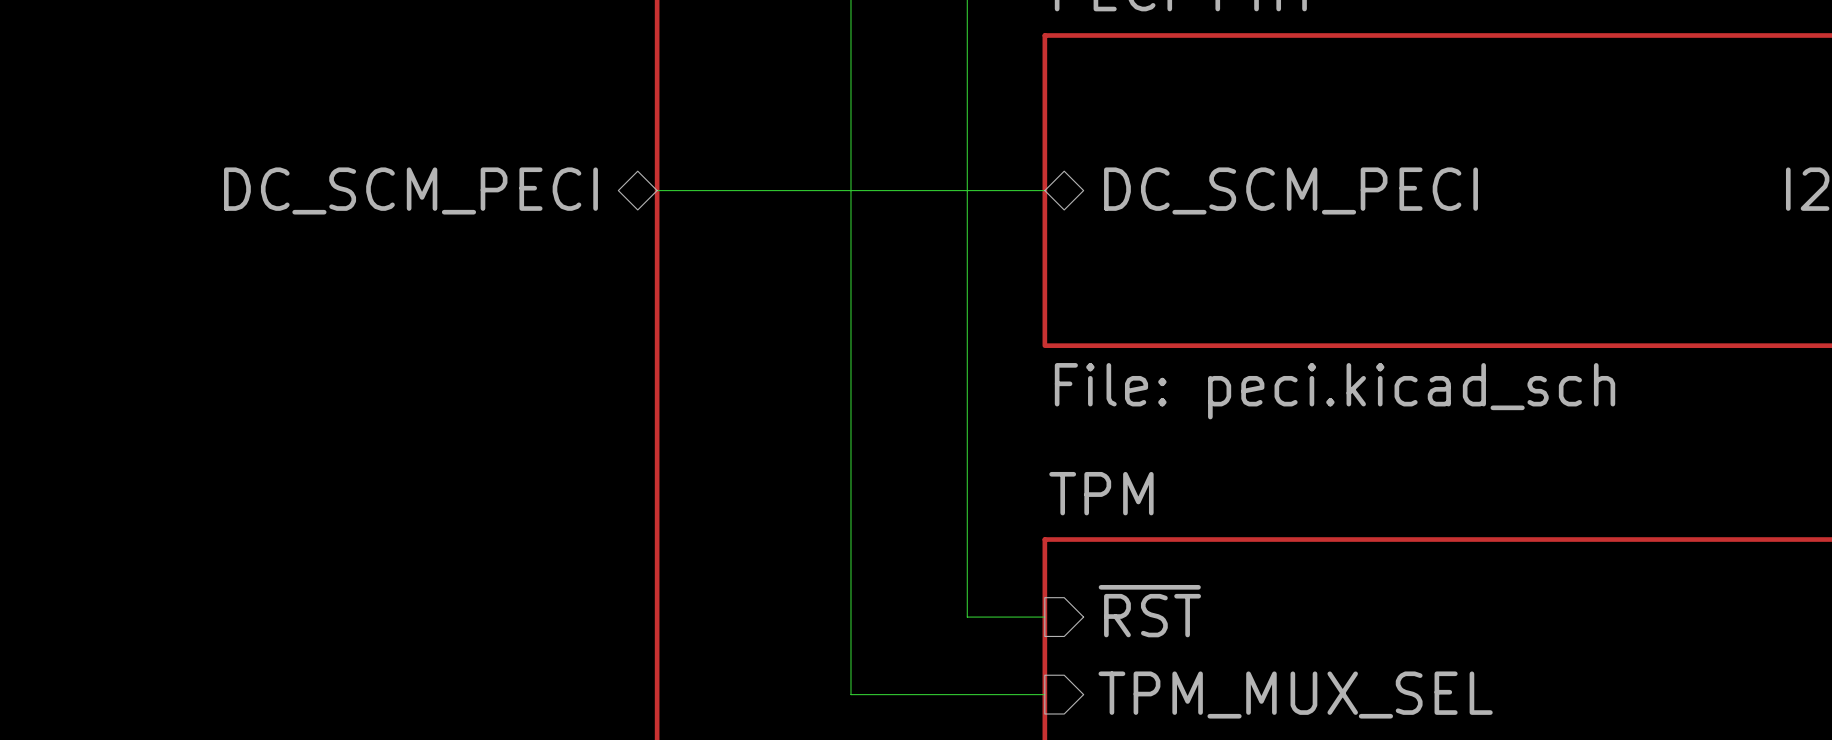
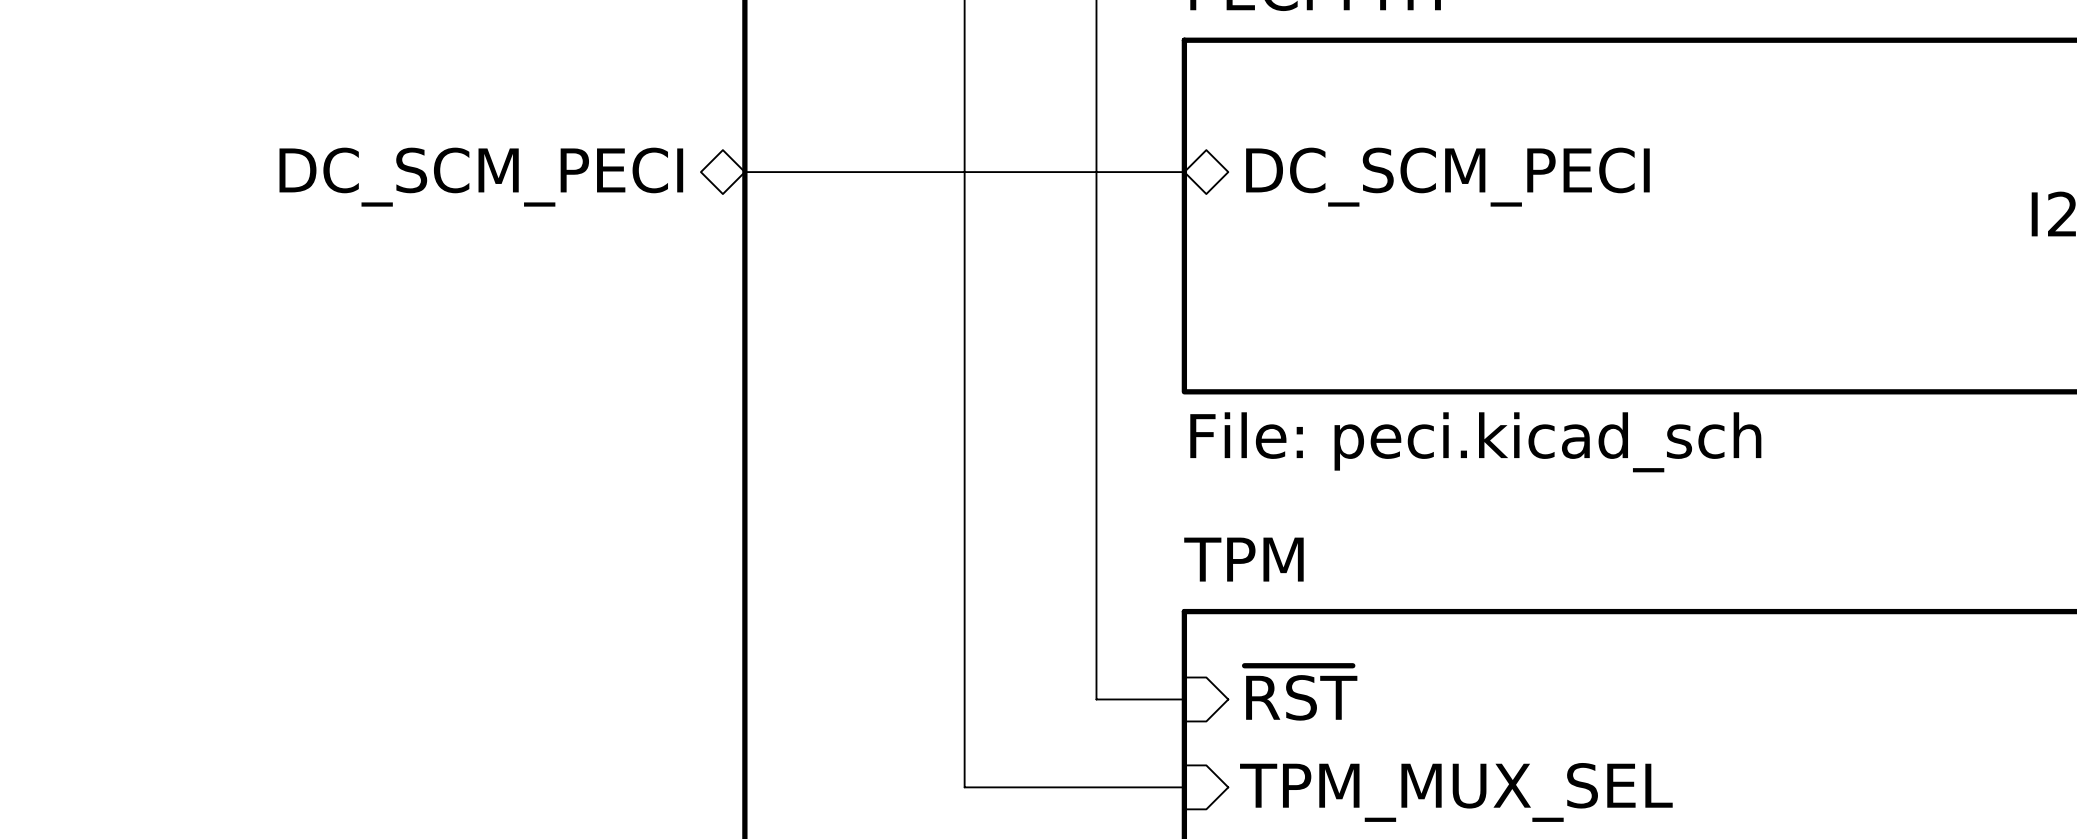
sheet pin position: DC_SCM_PECI (410, 190) -> DC_SCM_PECI (481, 177)
wire: (657, 190) (1044, 190) -> (744, 172) (1184, 172)
sheet pin position: DC_SCM_PECI (1291, 190) -> DC_SCM_PECI (1447, 177)

